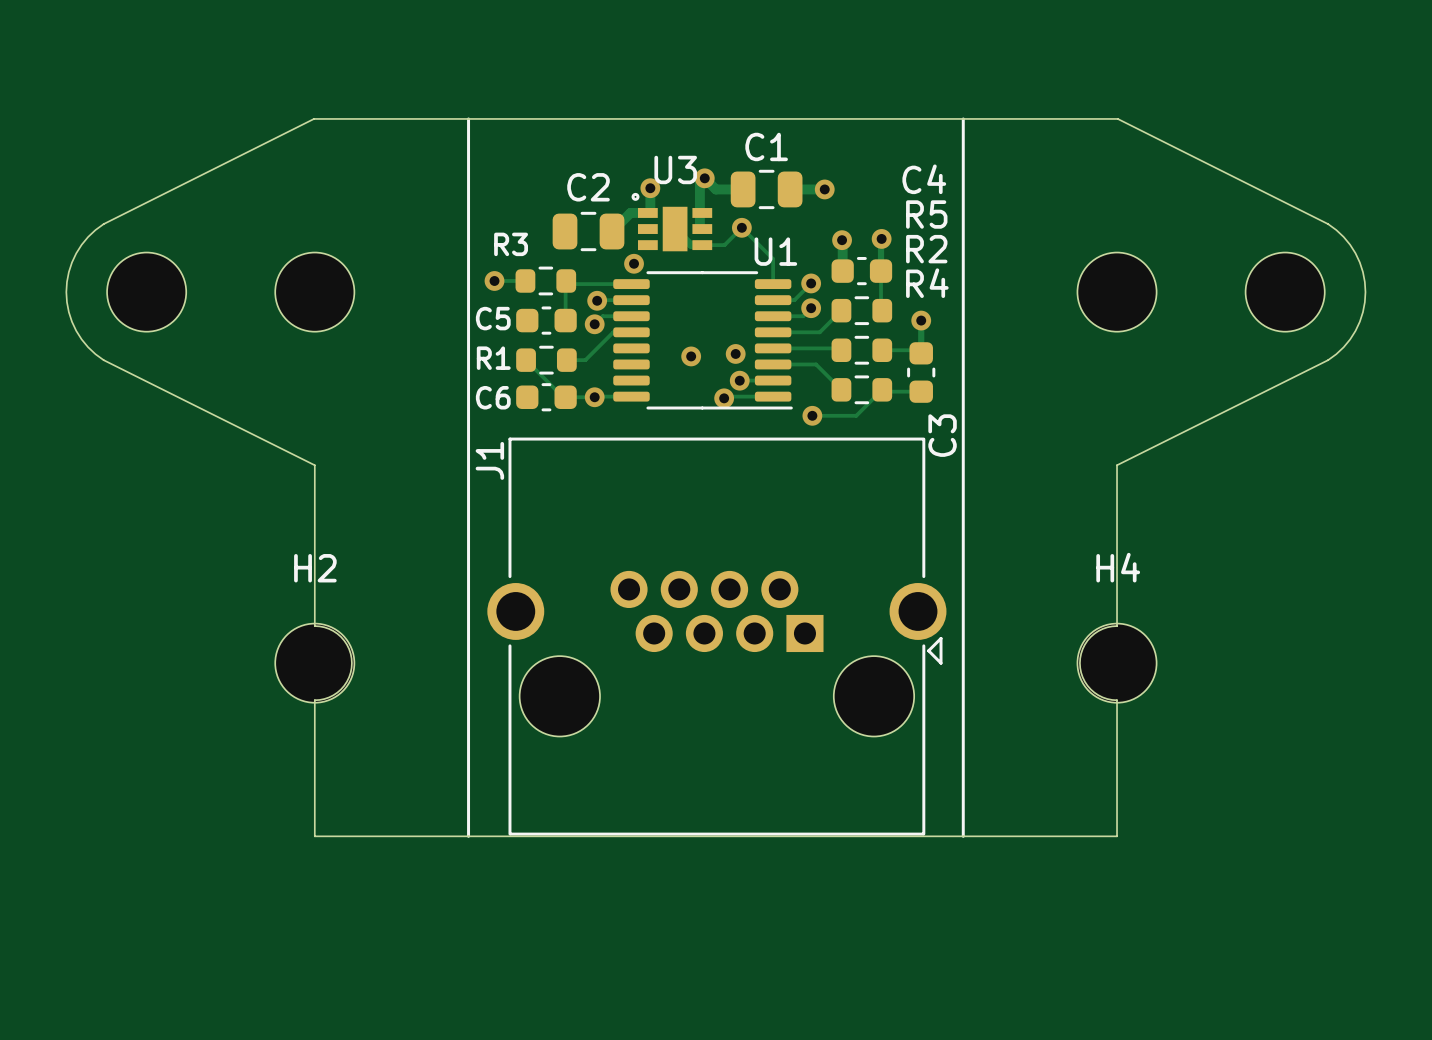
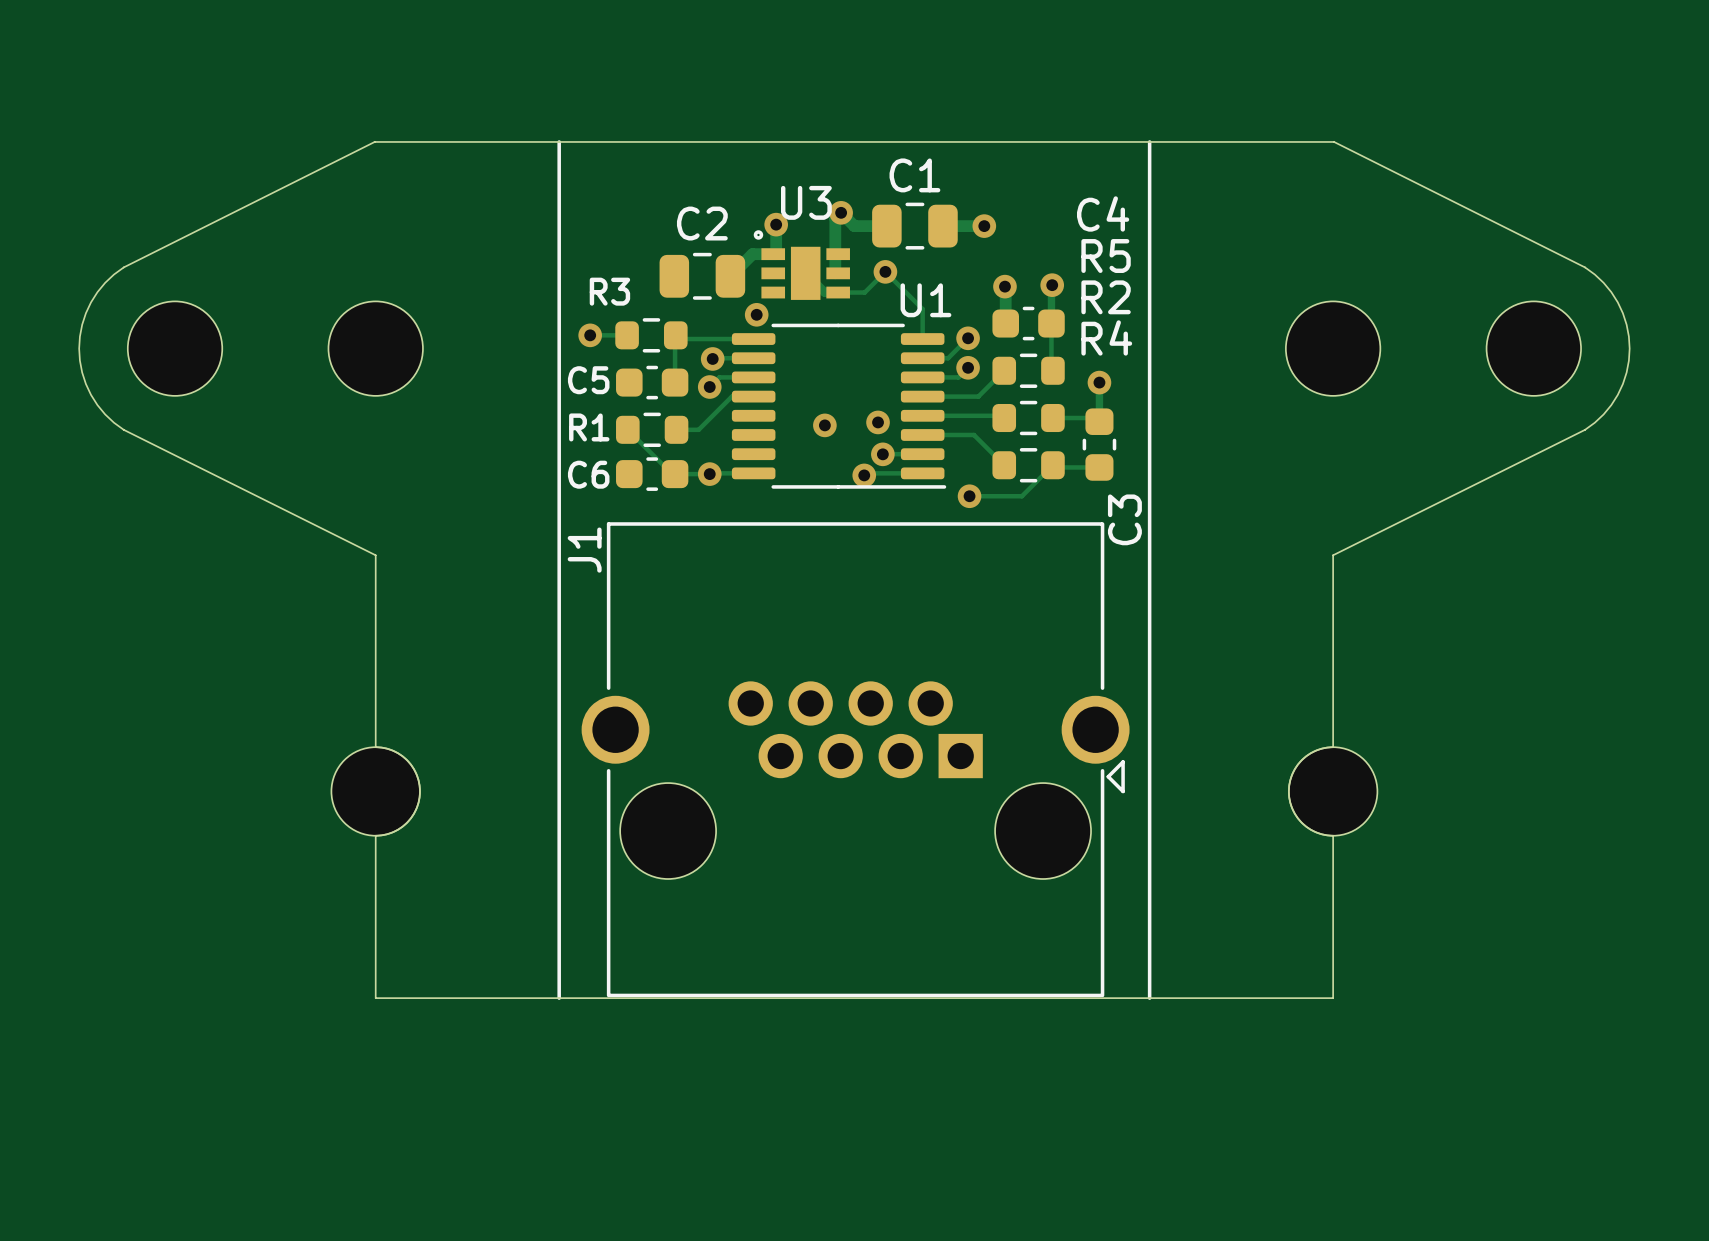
H2: (314, 663) -> none
part: none -> (375, 791)
H4: (1117, 663) -> none
part: none -> (1333, 791)

